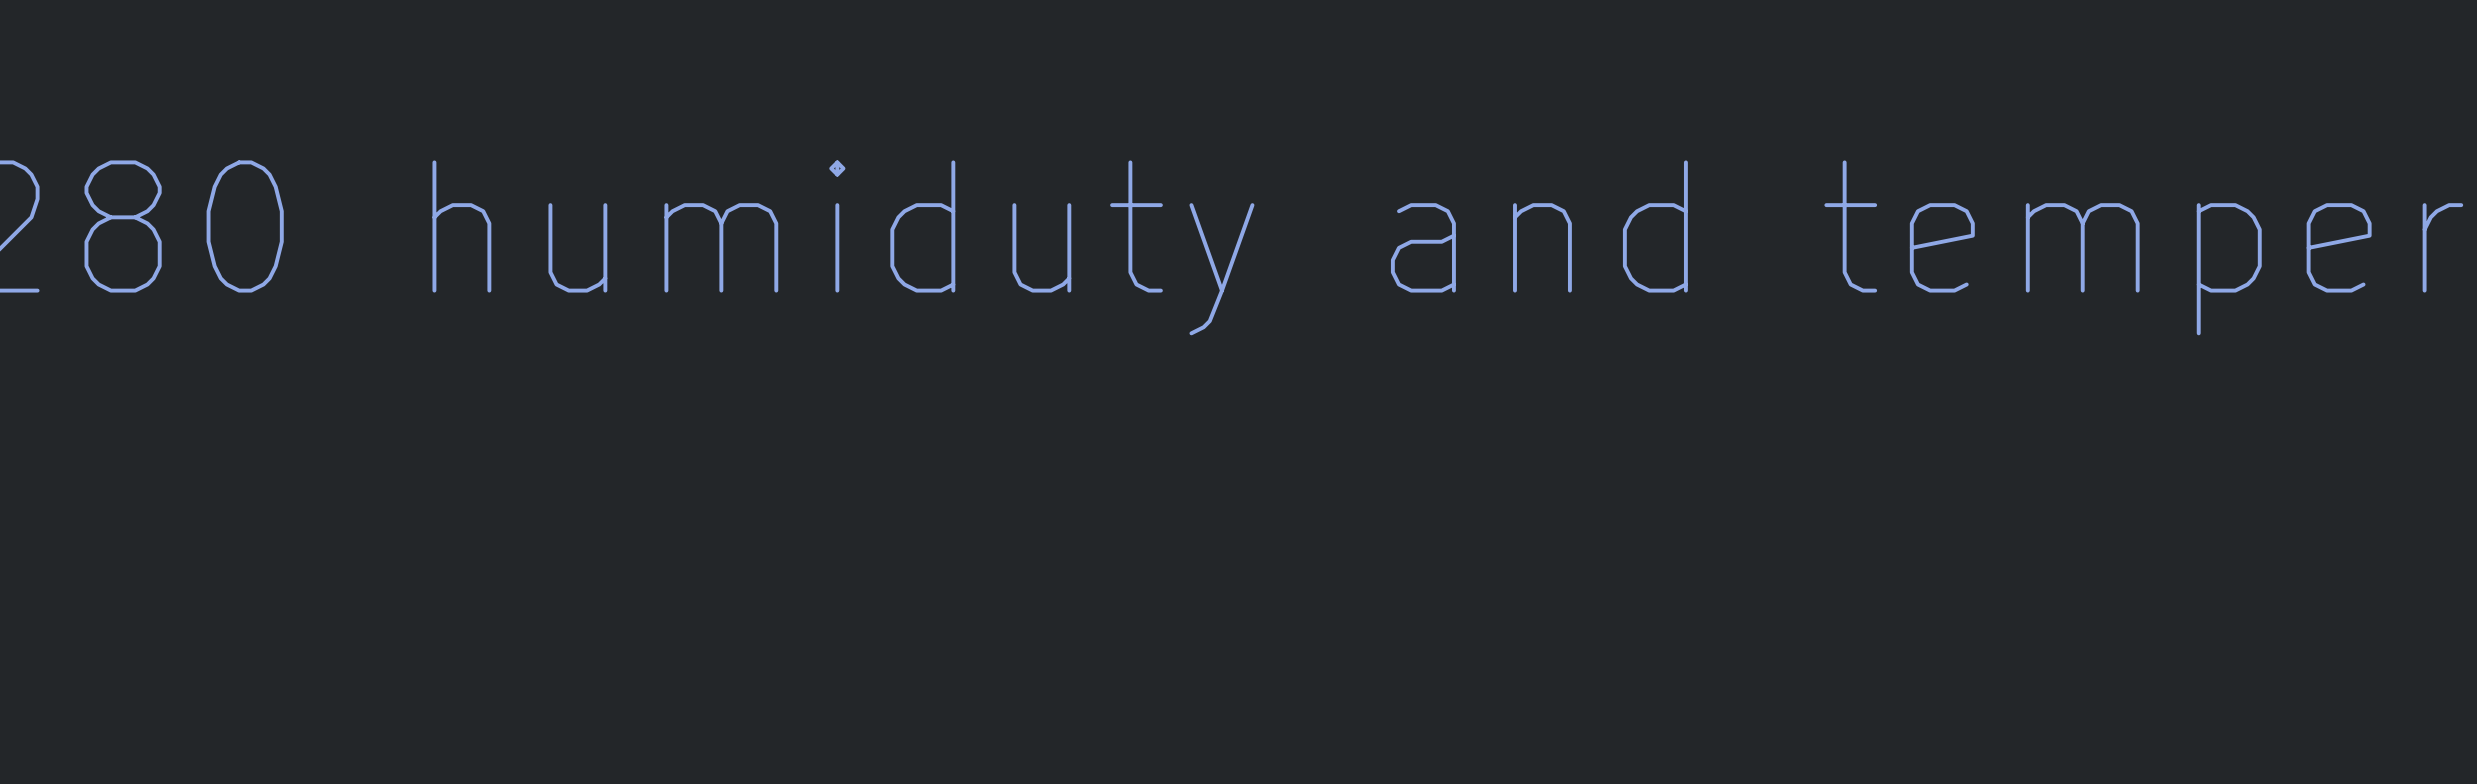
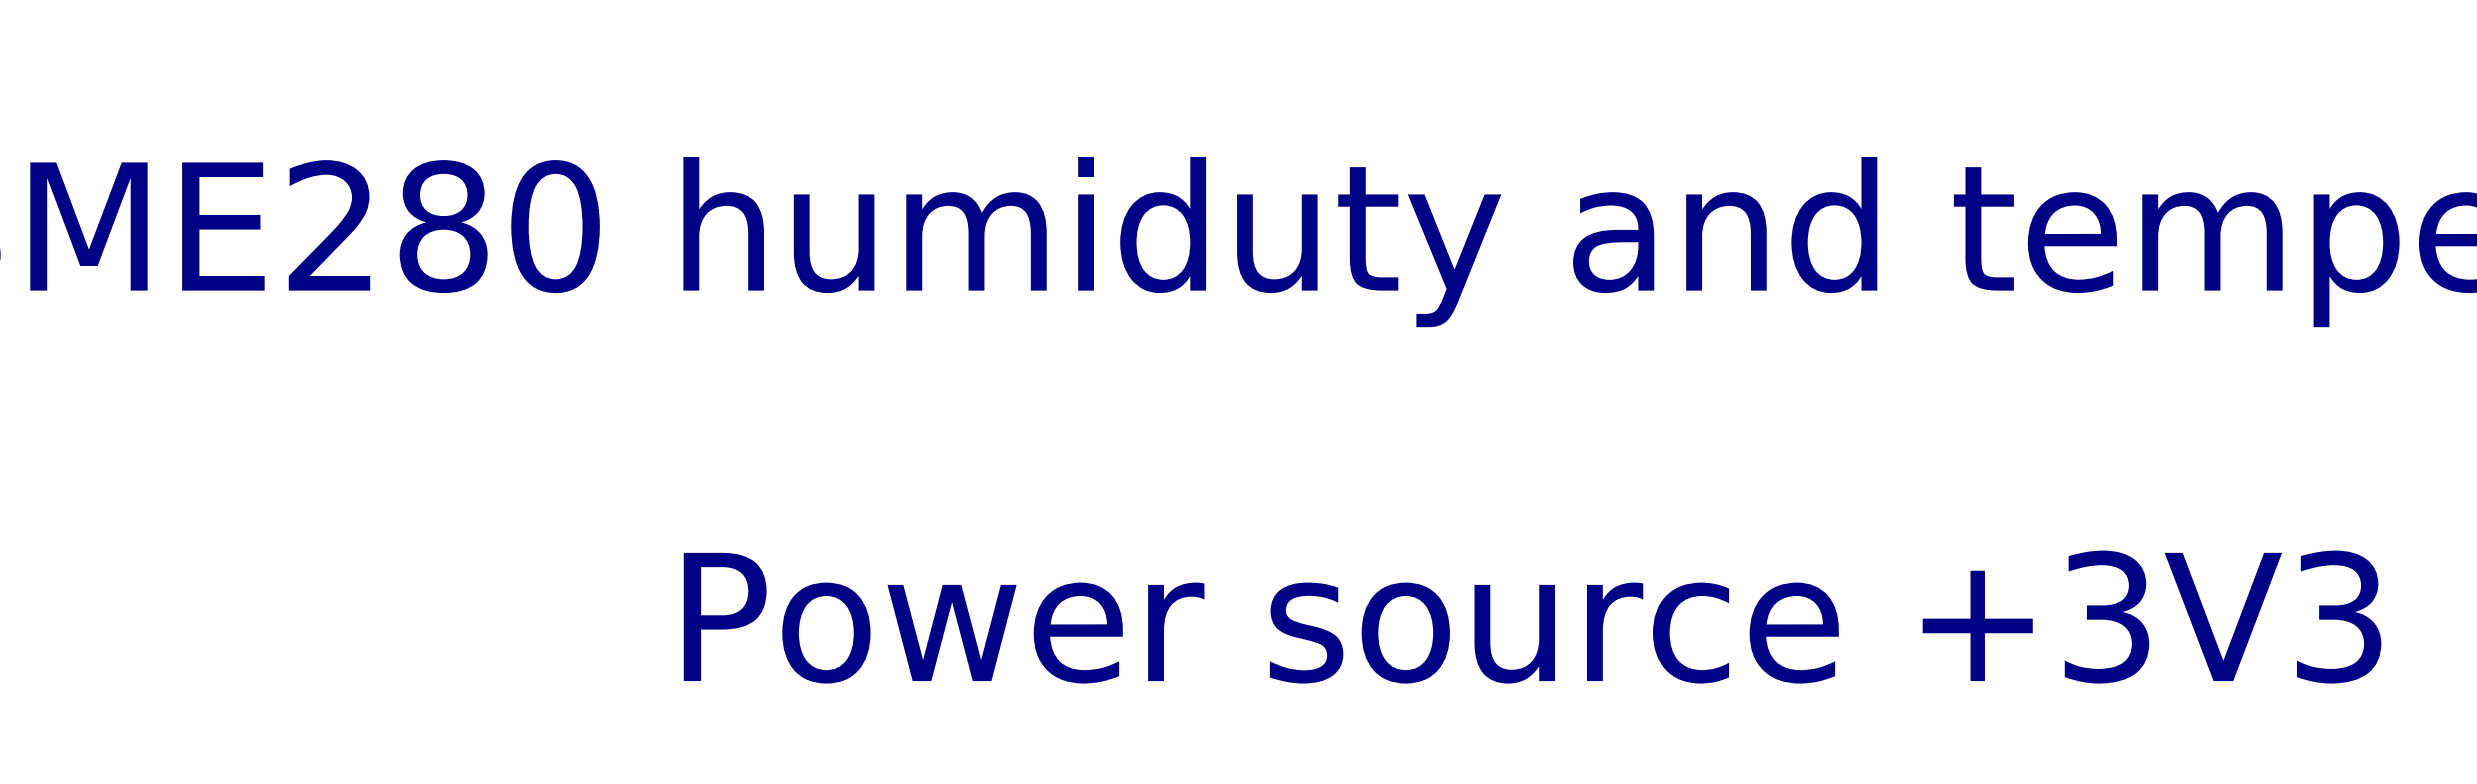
text: none -> Power source +3V3 (1532, 617)

